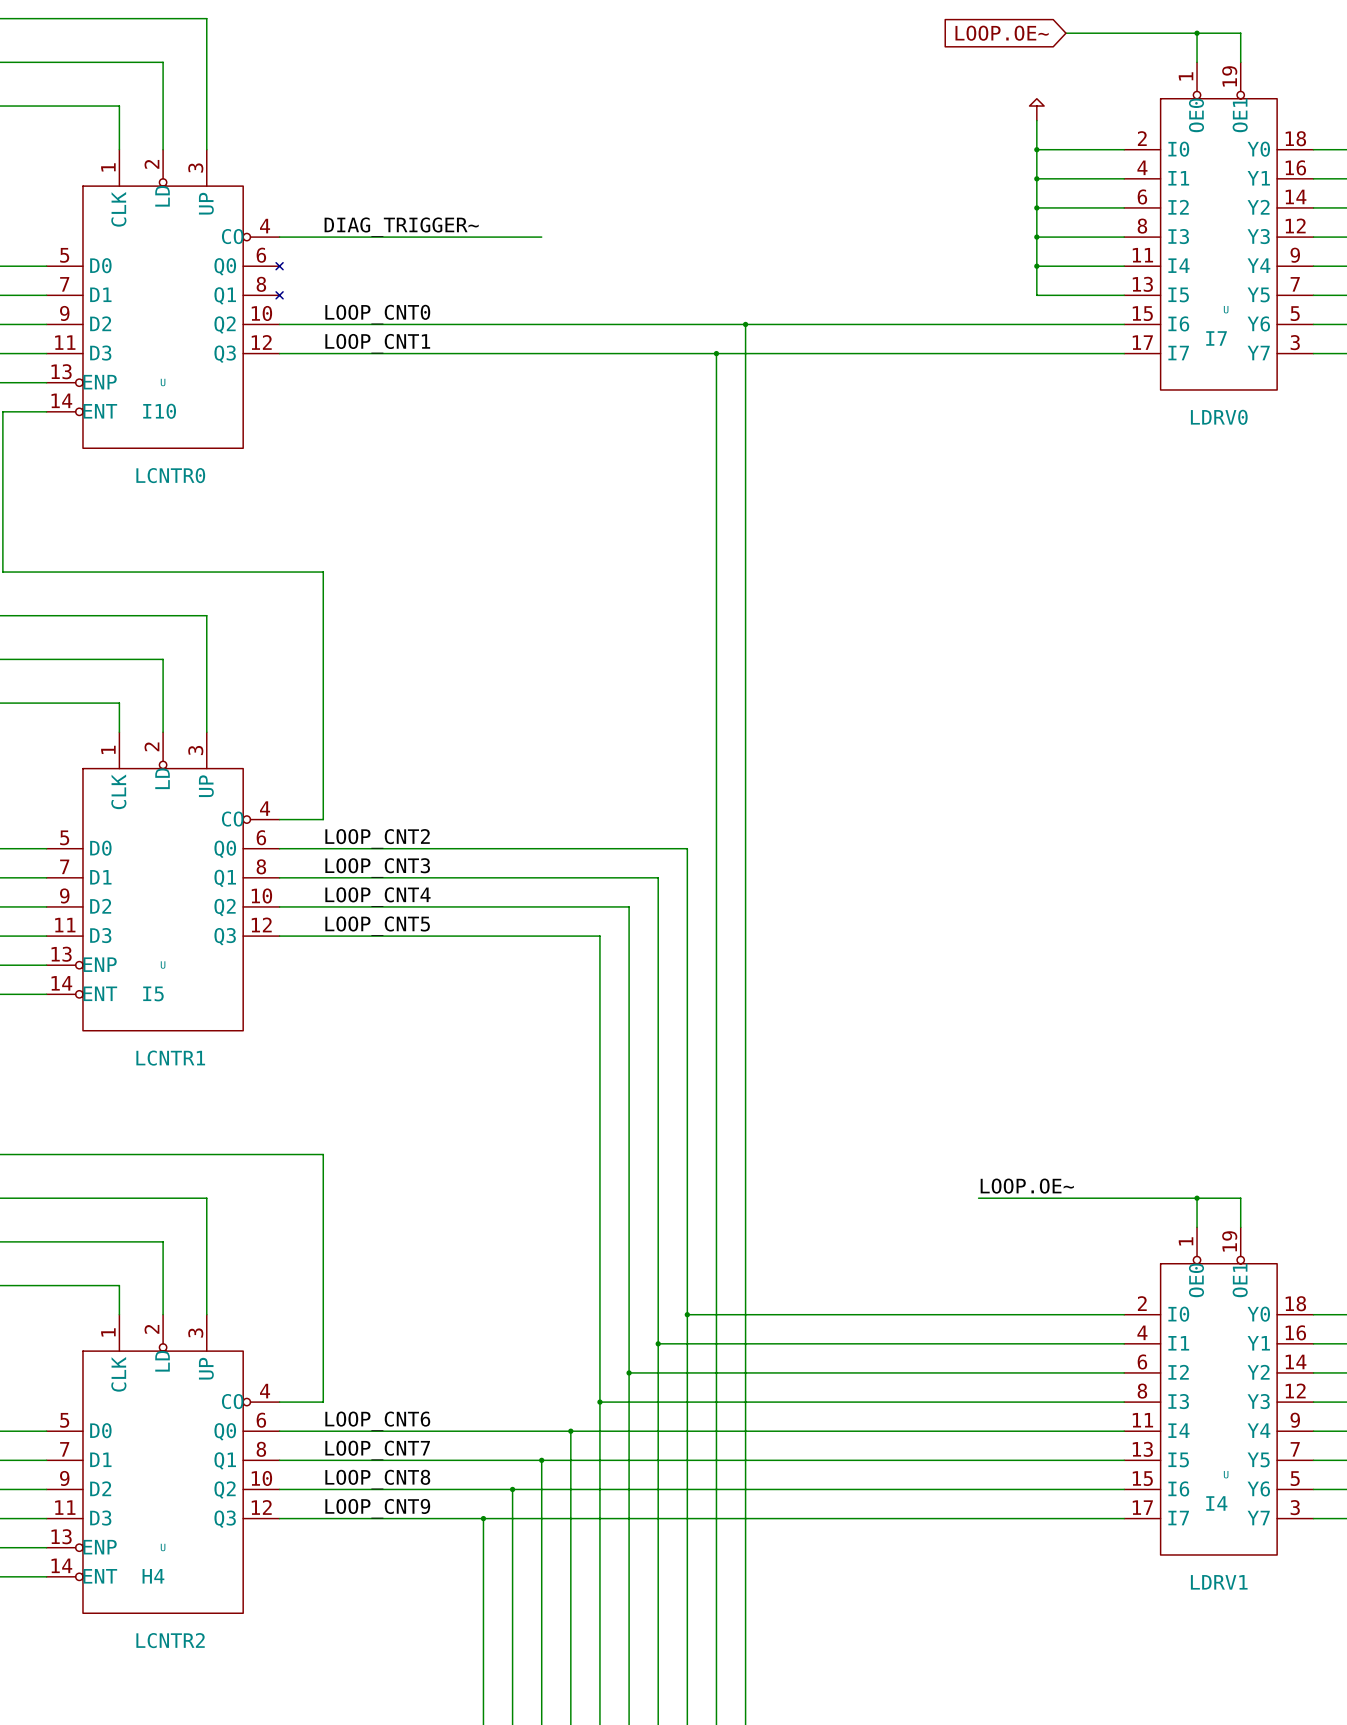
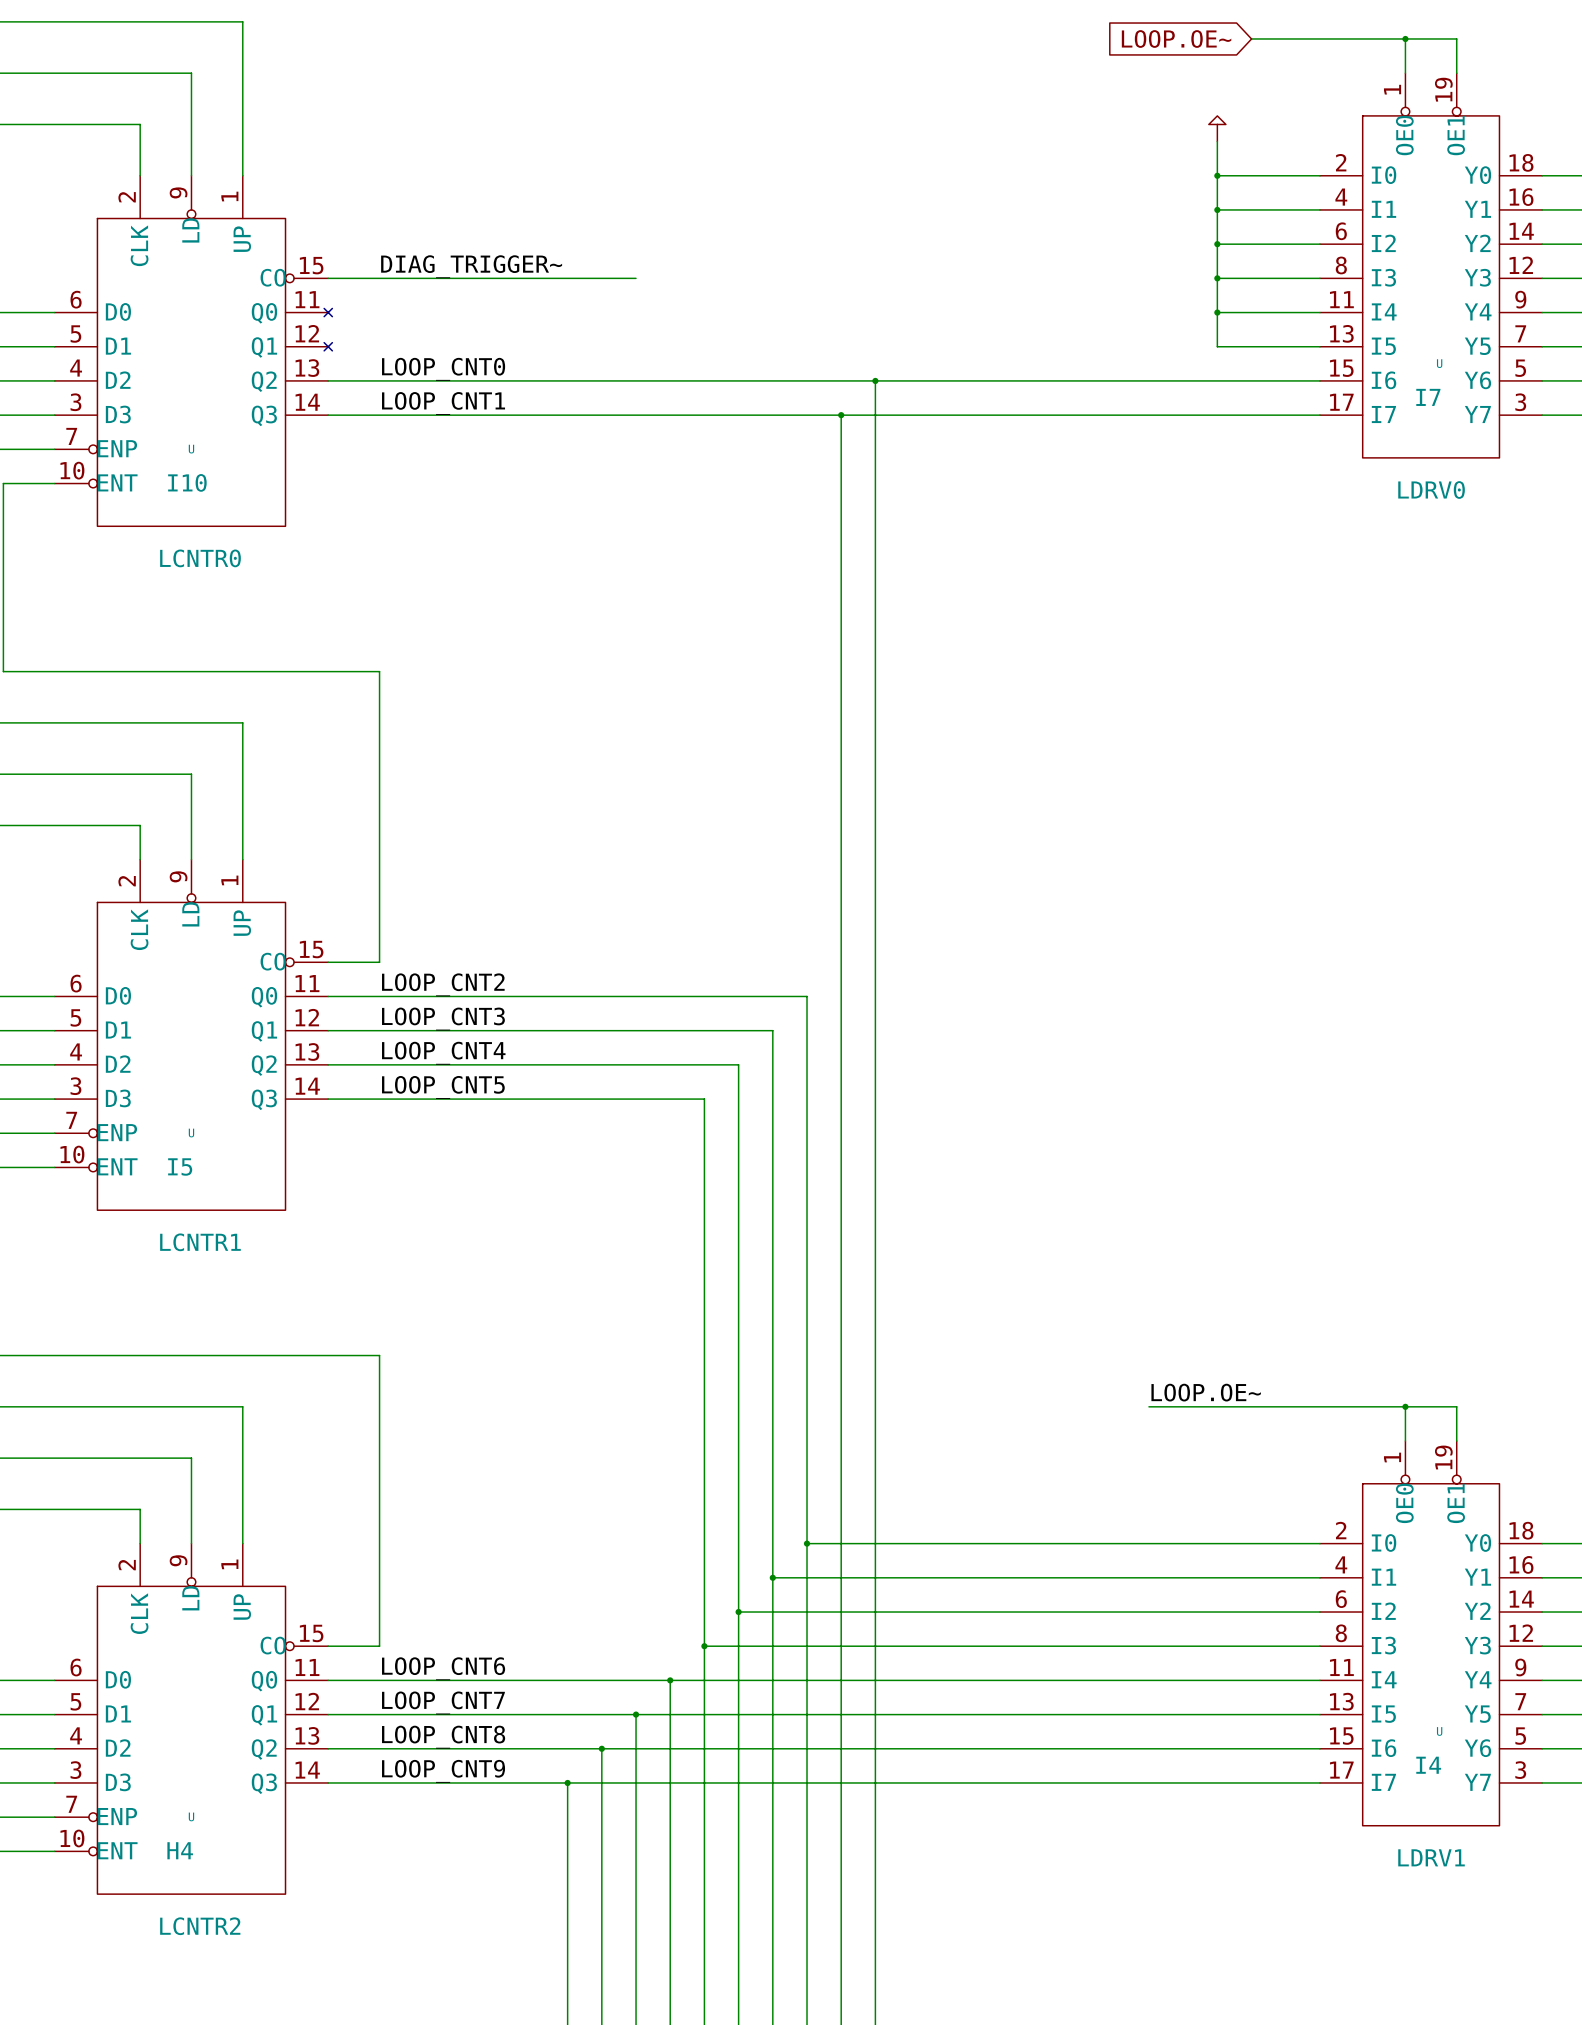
U symbol: [46, 149, 280, 449] -> [54, 175, 329, 527]
U symbol: [46, 732, 280, 1031] -> [54, 859, 329, 1211]
U symbol: [46, 1314, 280, 1614] -> [54, 1543, 329, 1895]

